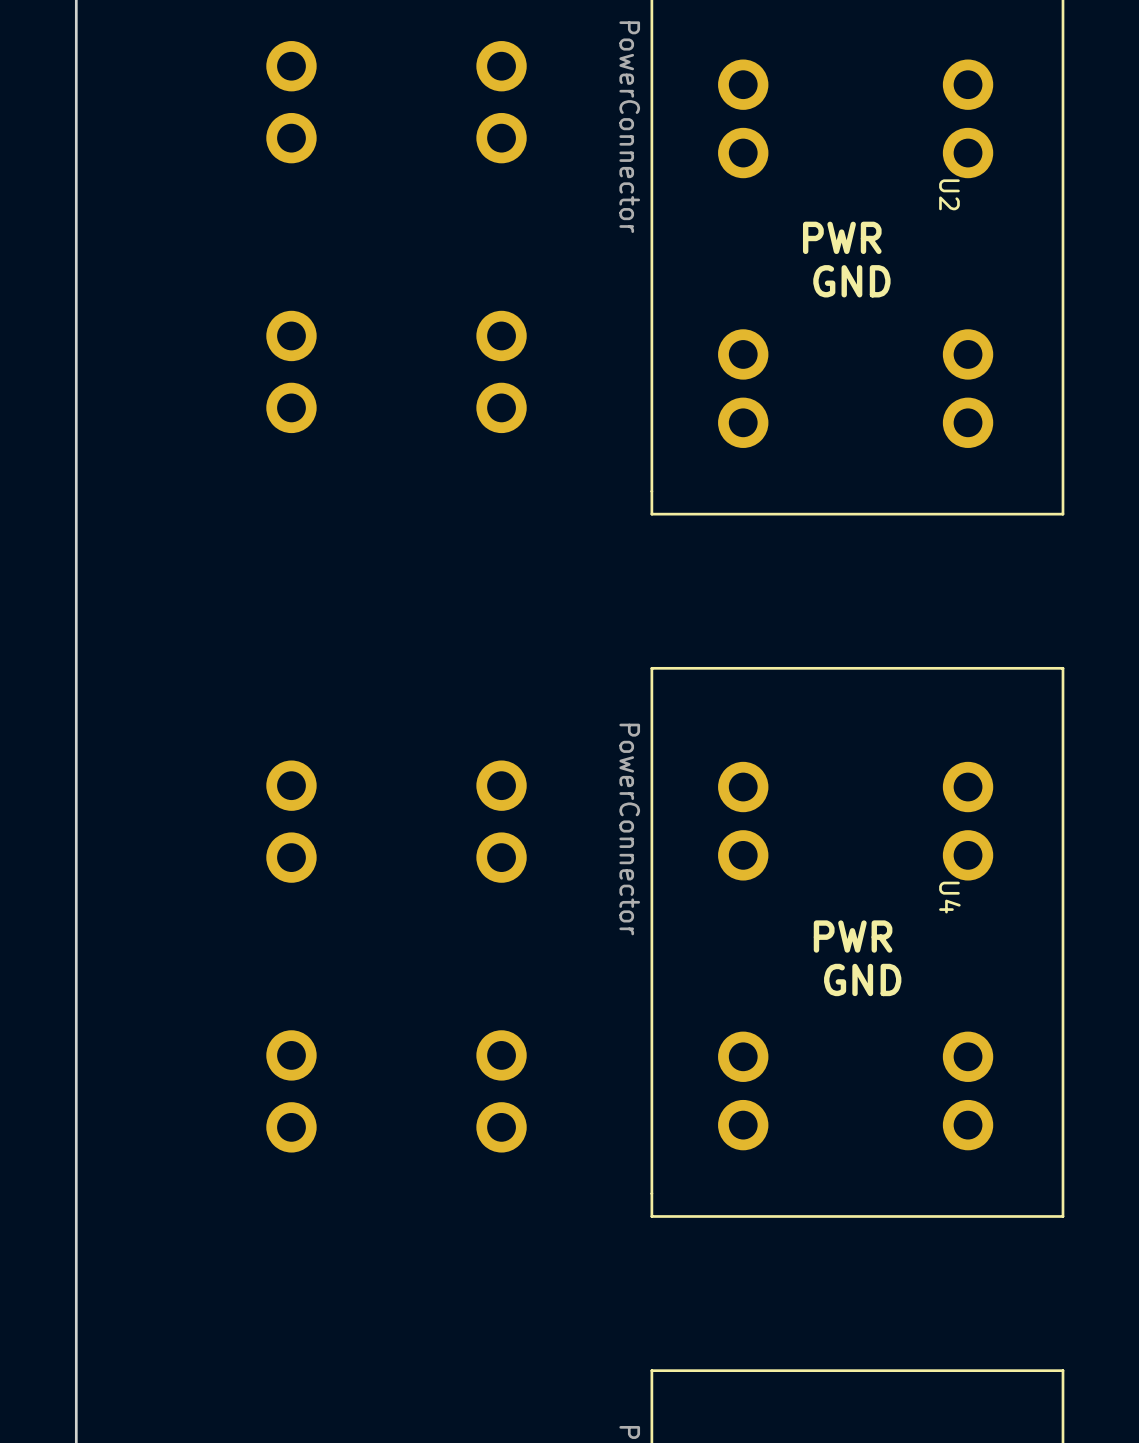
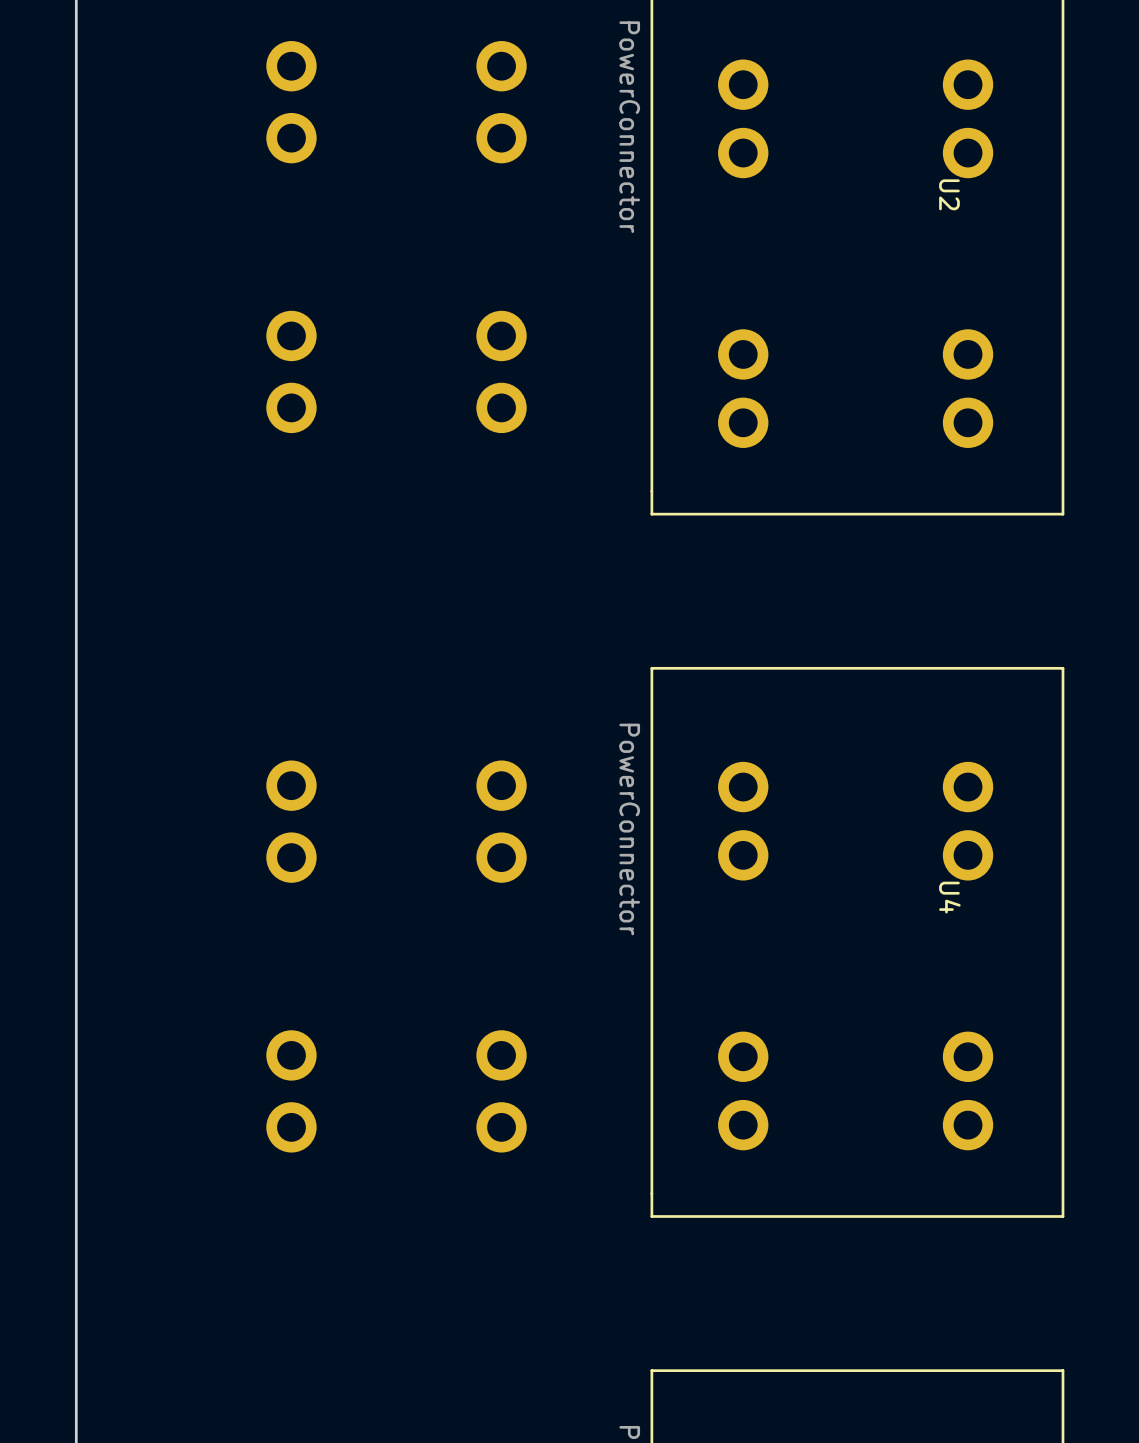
text: PWR (842, 237) -> none
text: GND (851, 281) -> none
text: PWR (853, 936) -> none
text: GND (862, 979) -> none

